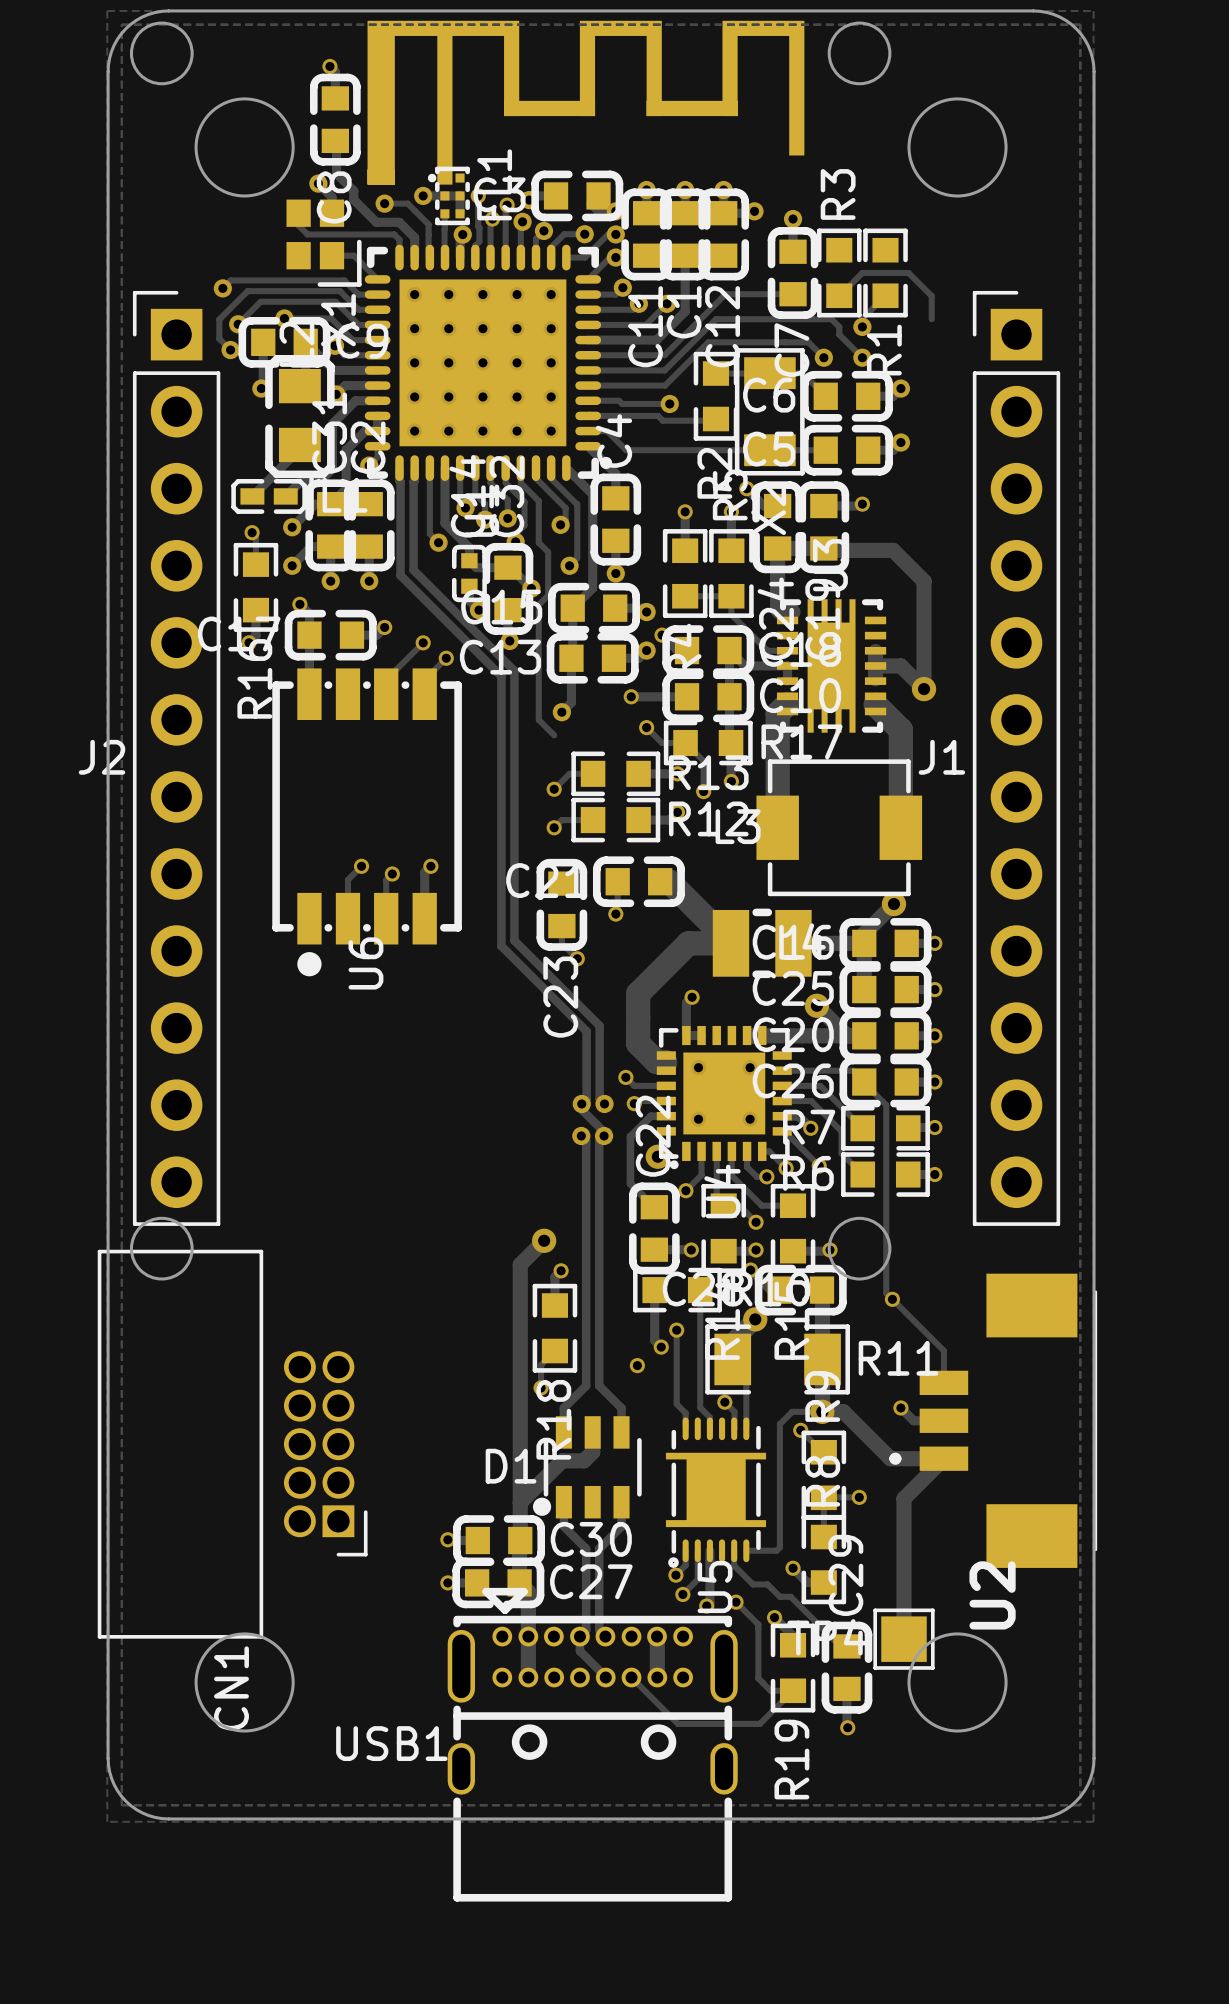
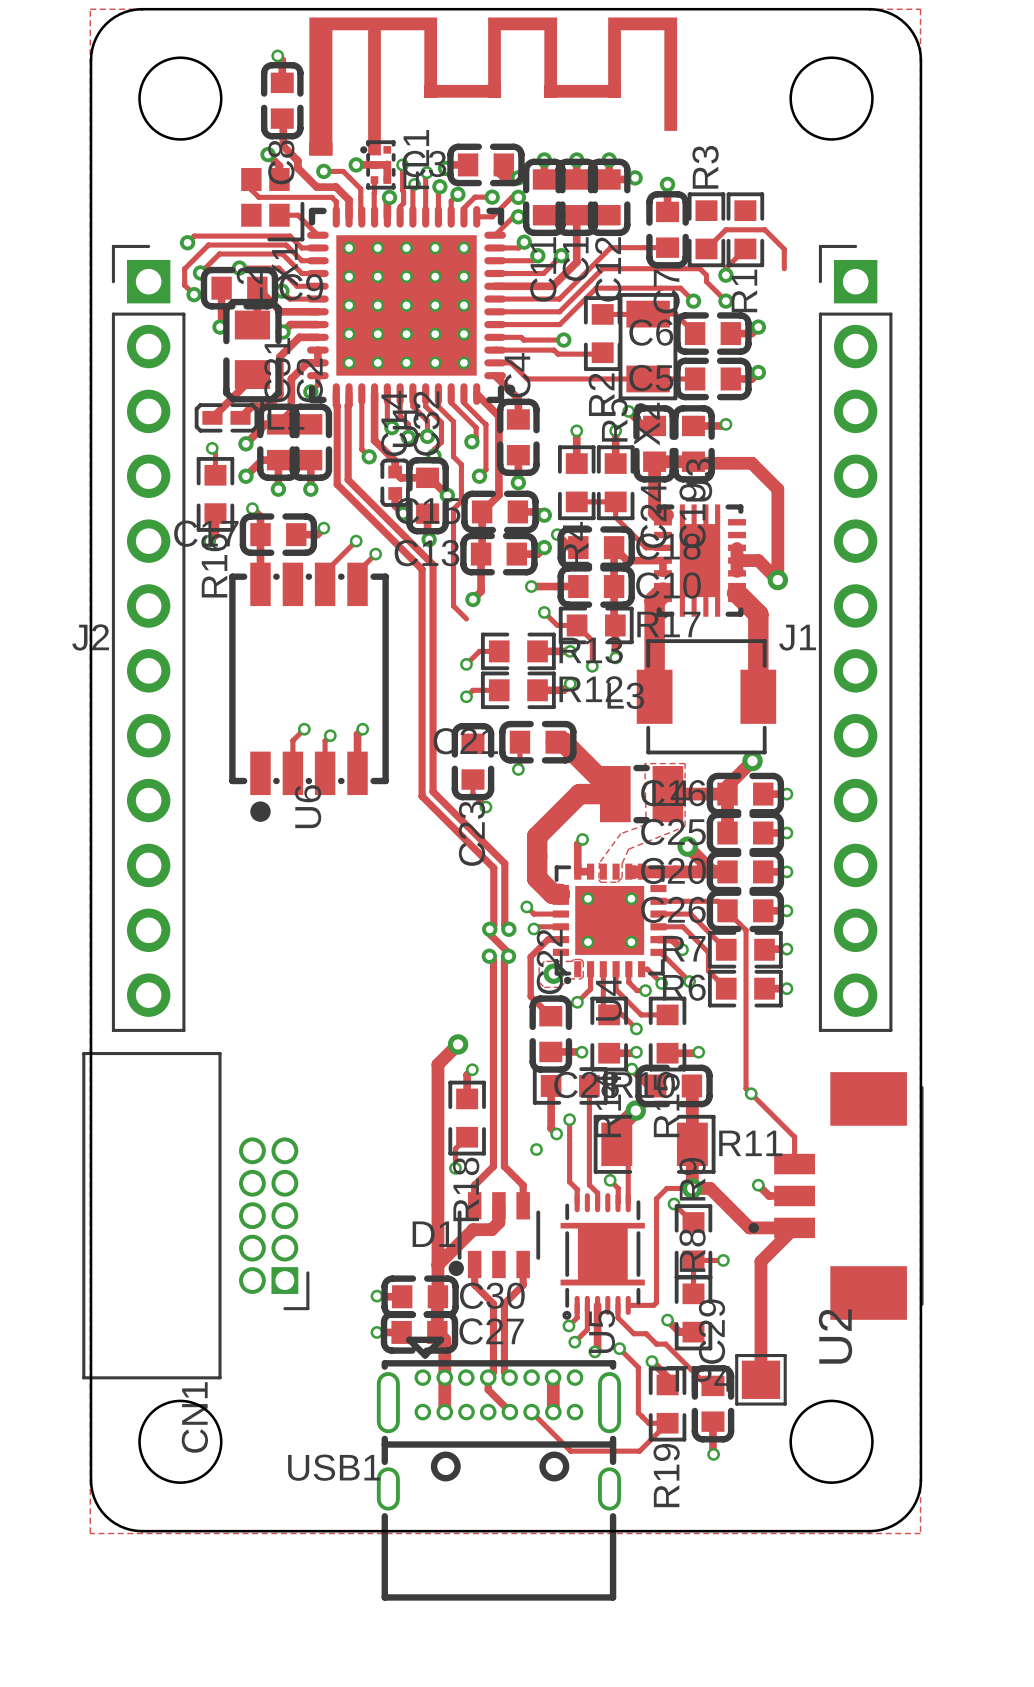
round board edge: [129, 21, 194, 86] -> none
round board edge: [827, 21, 892, 86] -> none
zone outline: (121, 24) (1080, 24) (1080, 1805) (121, 1805) (121, 24) -> none
round board edge position: (244, 147) -> (180, 98)
round board edge position: (957, 147) -> (831, 98)
zone outline: none -> (644, 763) (685, 763) (685, 826) (628, 849) (622, 863) (622, 877) (617, 882) (600, 882) (598, 879) (599, 862) (620, 833) (646, 824) (644, 763)
zone outline: none -> (574, 959) (583, 961) (583, 976) (580, 978) (568, 978) (559, 987) (544, 987) (539, 982) (539, 967) (544, 961) (571, 961) (574, 959)
round board edge: [129, 1216, 194, 1281] -> none
round board edge: [827, 1216, 892, 1281] -> none
round board edge position: (244, 1682) -> (180, 1441)
round board edge position: (957, 1682) -> (831, 1441)

